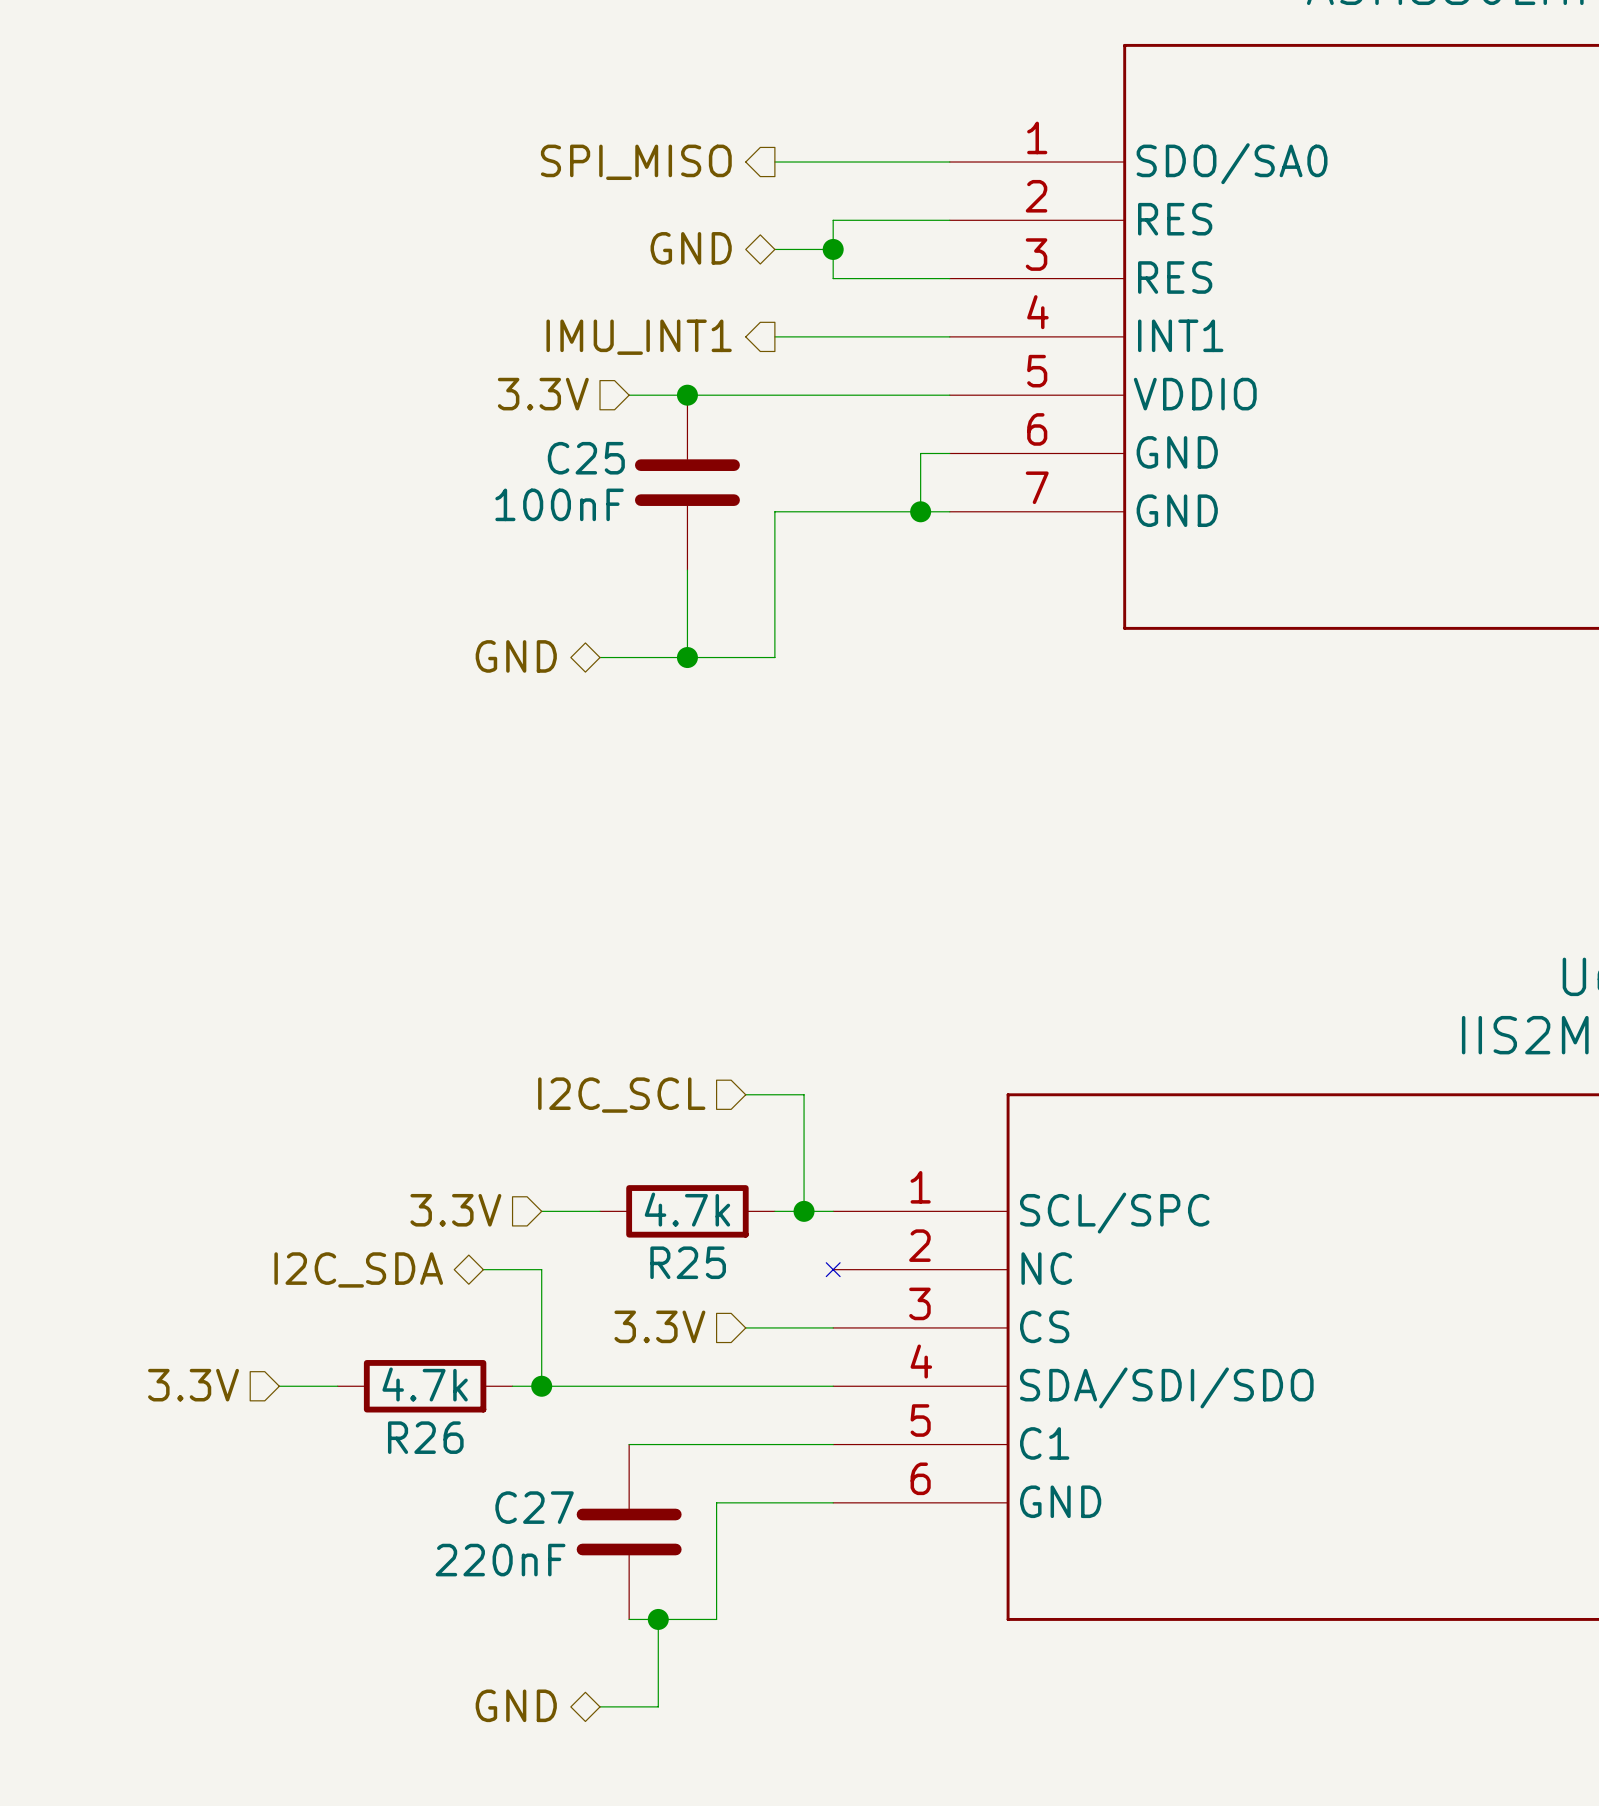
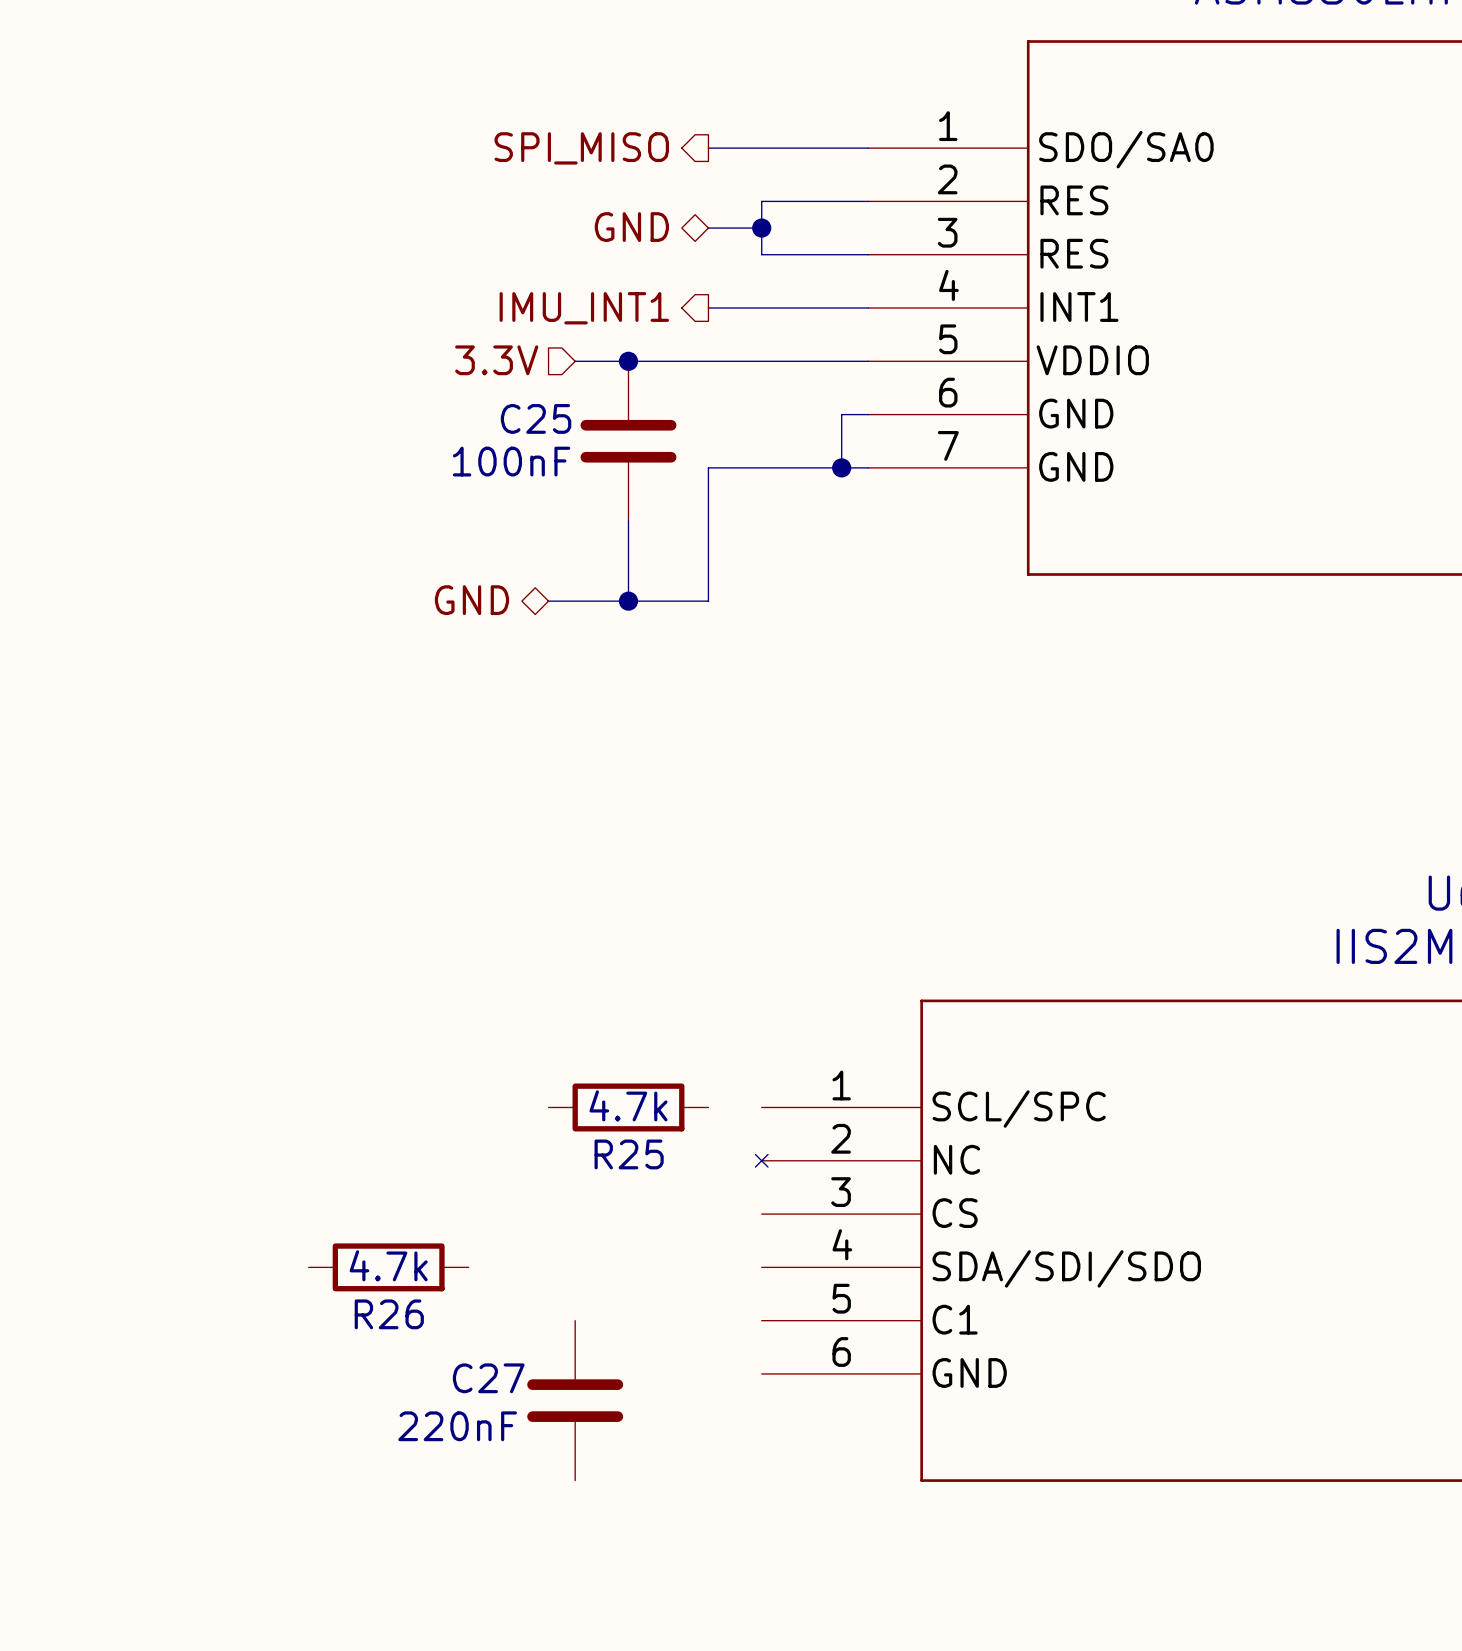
wire: (745, 1094) (804, 1094) (804, 1211) -> none
hierarchical label: I2C_SCL (621, 1095) -> none
hierarchical label: 3.3V (455, 1210) -> none
wire: (541, 1211) (599, 1211) -> none
wire: (774, 1211) (833, 1211) -> none
junction: (804, 1211) -> none
hierarchical label: I2C_SDA (358, 1269) -> none
wire: (483, 1269) (541, 1269) (541, 1386) -> none
hierarchical label: 3.3V (659, 1326) -> none
wire: (745, 1327) (833, 1327) -> none
hierarchical label: 3.3V (193, 1385) -> none
wire: (279, 1386) (337, 1386) -> none
wire: (512, 1386) (833, 1386) -> none
junction: (541, 1386) -> none
wire: (629, 1444) (833, 1444) -> none
wire: (833, 1502) (716, 1502) (716, 1619) (629, 1619) -> none
wire: (658, 1619) (658, 1706) (599, 1706) -> none
junction: (658, 1619) -> none
hierarchical label: GND (516, 1705) -> none

